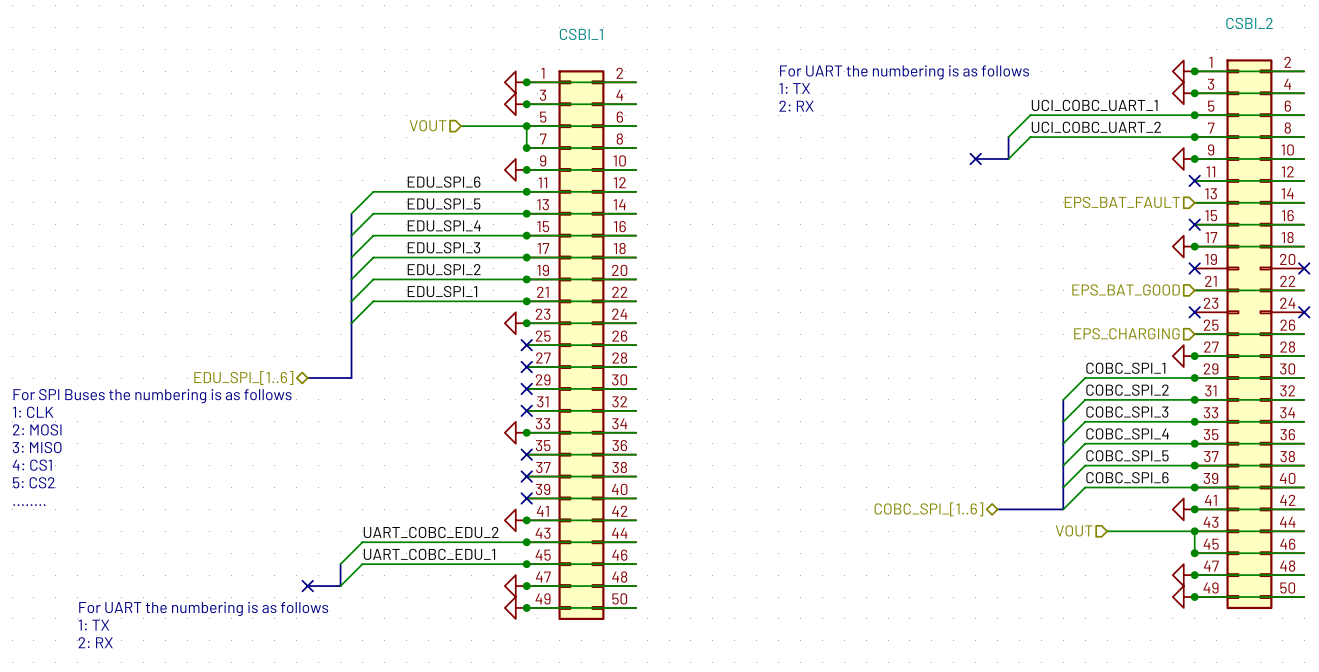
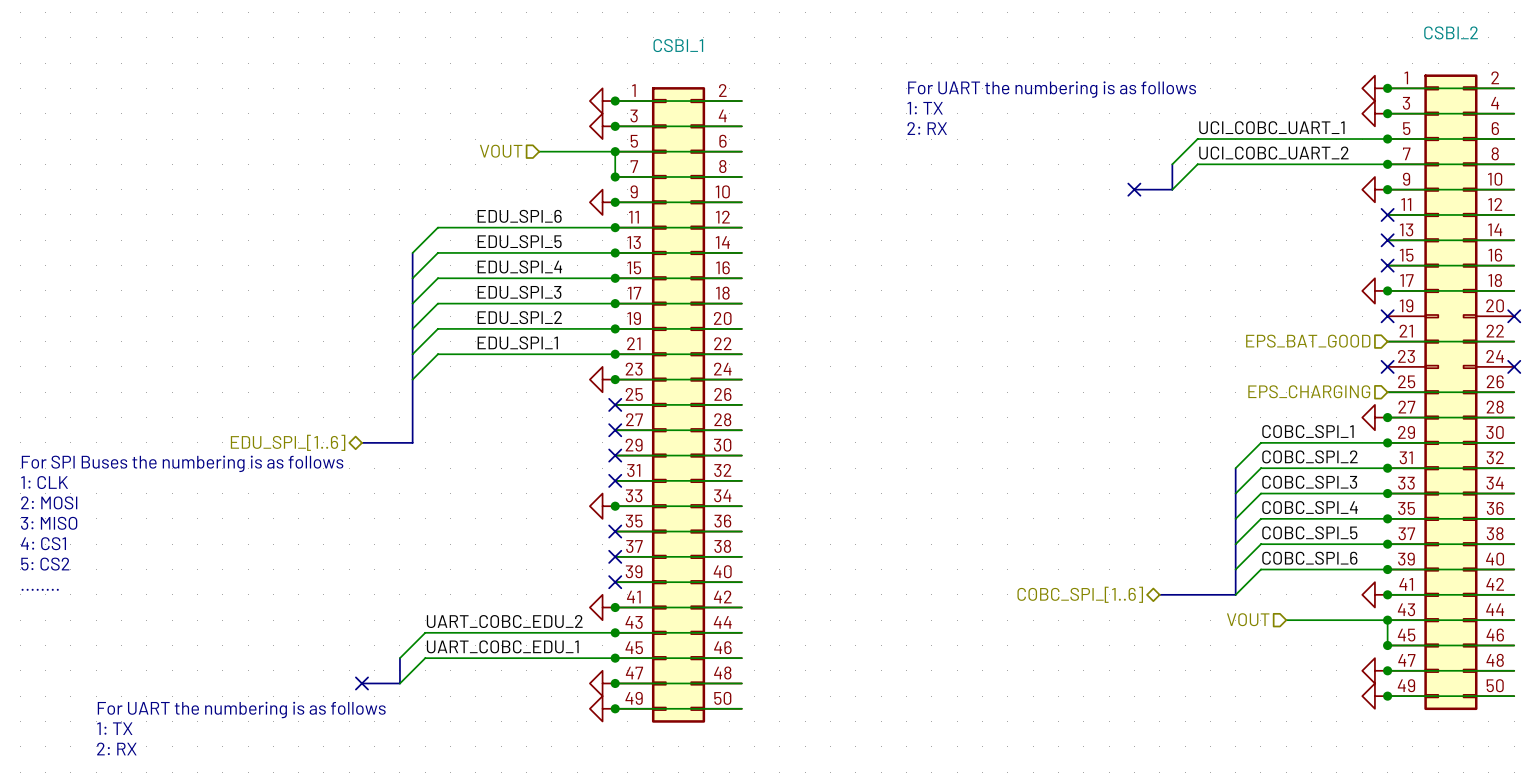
hierarchical label: EPS_BAT_FAULT (1122, 202) -> none
no-connect mark: none -> (1387, 240)

